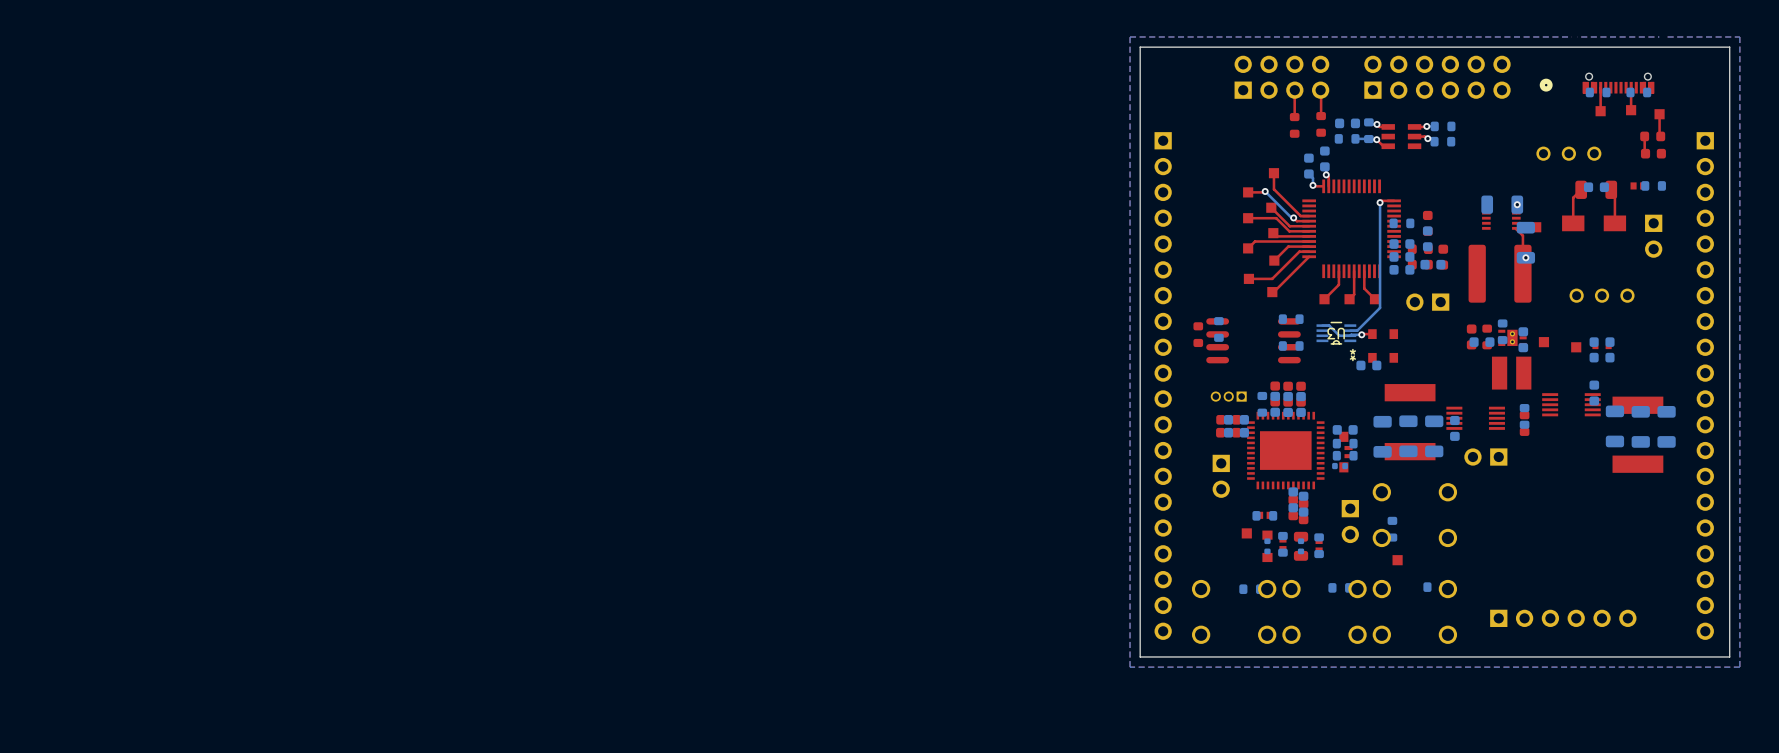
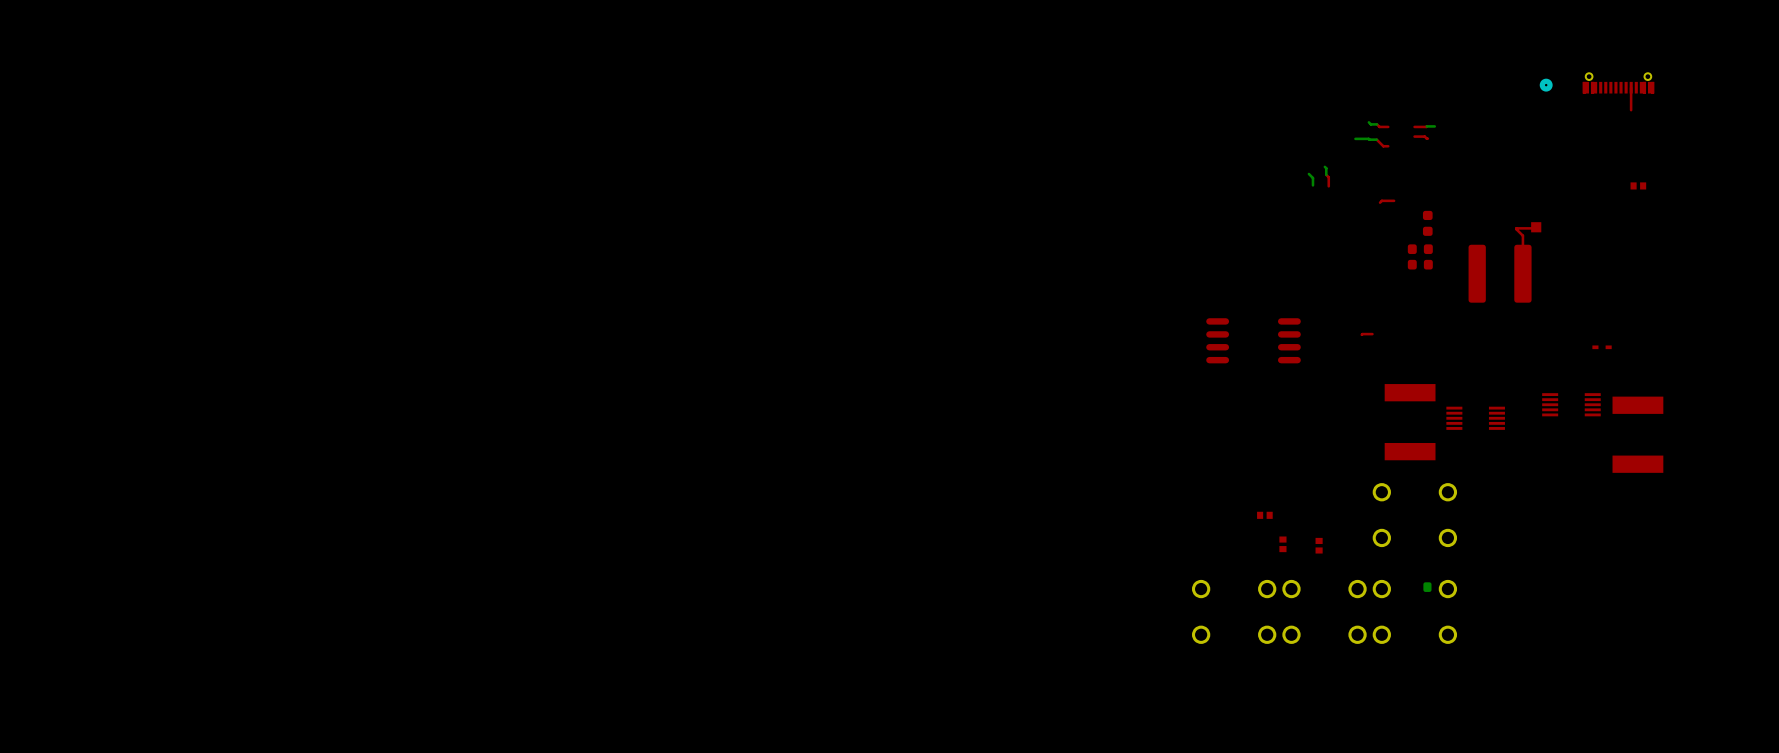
bottom zone outline: (1739, 36) (1739, 667) (1130, 667) (1130, 36) (1739, 36) -> none
top zone outline: (1739, 36) (1739, 667) (1130, 667) (1130, 36) (1739, 36) -> none
board edge: (1729, 47) (1729, 656) (1140, 656) (1140, 47) (1729, 47) -> none
part: (1281, 77) -> none
part: (1437, 77) -> none
top track: (1600, 87) (1600, 111) -> none
top track: (1294, 90) (1294, 117) -> none
top track: (1320, 90) (1321, 116) -> none
part: (1598, 92) -> none
part: (1638, 92) -> none
part: (1631, 110) -> none
part: (1600, 111) -> none
top track: (1659, 114) (1660, 136) -> none
part: (1659, 114) -> none
part: (1347, 123) -> none
part: (1321, 124) -> none
via: (1377, 124) -> none
part: (1294, 125) -> none
via: (1426, 126) -> none
part: (1443, 126) -> none
part: (1368, 130) -> none
part: (1401, 136) -> none
top track: (1644, 136) (1645, 153) -> none
part: (1652, 136) -> none
part: (1347, 138) -> none
via: (1427, 138) -> none
via: (1376, 139) -> none
part: (1442, 141) -> none
part: (1568, 153) -> none
part: (1653, 153) -> none
part: (1324, 158) -> none
part: (1308, 166) -> none
top track: (1273, 173) (1273, 189) (1300, 216) (1309, 216) -> none
part: (1273, 173) -> none
via: (1326, 174) -> none
top track: (1312, 185) (1323, 186) -> none
via: (1312, 185) -> none
part: (1653, 185) -> none
part: (1596, 187) -> none
top track: (1581, 189) (1573, 197) (1573, 223) -> none
part: (1596, 189) -> none
top track: (1611, 189) (1614, 193) (1614, 223) -> none
top track: (1265, 191) (1248, 192) -> none
bottom track: (1265, 191) (1293, 217) -> none
via: (1265, 191) -> none
part: (1248, 192) -> none
bottom track: (1380, 202) (1380, 307) (1357, 330) (1350, 330) -> none
via: (1380, 202) -> none
part: (1502, 204) -> none
via: (1517, 204) -> none
top track: (1271, 207) (1289, 226) (1309, 226) -> none
part: (1271, 207) -> none
top track: (1293, 217) (1296, 221) (1309, 221) -> none
via: (1293, 217) -> none
top track: (1248, 218) (1276, 218) (1289, 231) (1309, 231) -> none
part: (1248, 218) -> none
part: (1501, 218) -> none
part: (1401, 223) -> none
part: (1594, 223) -> none
part: (1351, 228) -> none
top track: (1273, 233) (1276, 236) (1309, 236) -> none
part: (1273, 233) -> none
part: (1653, 236) -> none
part: (1427, 238) -> none
top track: (1309, 241) (1255, 241) (1248, 248) -> none
part: (1525, 242) -> none
part: (1401, 244) -> none
top track: (1309, 246) (1288, 246) (1274, 260) -> none
part: (1248, 248) -> none
top track: (1309, 251) (1299, 251) (1272, 278) (1248, 278) -> none
top track: (1309, 256) (1272, 292) -> none
part: (1401, 256) -> none
part: (1443, 257) -> none
via: (1525, 257) -> none
part: (1274, 260) -> none
part: (1432, 264) -> none
part: (1401, 269) -> none
top track: (1338, 271) (1338, 284) (1324, 299) -> none
top track: (1354, 271) (1354, 294) (1349, 299) -> none
top track: (1364, 271) (1364, 288) (1374, 299) -> none
part: (1248, 278) -> none
part: (1272, 292) -> none
part: (1602, 295) -> none
part: (1324, 299) -> none
part: (1349, 299) -> none
part: (1374, 299) -> none
part: (1427, 302) -> none
part: (1291, 319) -> none
bottom track: (1322, 325) (1329, 325) (1339, 335) (1361, 334) -> none
part: (1218, 329) -> none
part: (1502, 331) -> none
U3: (1336, 333) -> none
part: (1198, 334) -> none
via: (1361, 334) -> none
part: (1471, 336) -> none
part: (1487, 336) -> none
part: (1512, 337) -> none
part: (1523, 339) -> none
part: (1481, 342) -> none
part: (1543, 342) -> none
part: (1602, 342) -> none
part: (1383, 345) -> none
part: (1291, 346) -> none
part: (1576, 347) -> none
part: (1602, 357) -> none
part: (1368, 365) -> none
part: (1511, 373) -> none
part: (1163, 386) -> none
part: (1705, 386) -> none
part: (1275, 393) -> none
part: (1594, 393) -> none
part: (1288, 394) -> none
part: (1301, 394) -> none
part: (1228, 396) -> none
part: (1262, 404) -> none
part: (1275, 404) -> none
part: (1288, 404) -> none
part: (1301, 404) -> none
part: (1524, 416) -> none
part: (1228, 419) -> none
part: (1236, 419) -> none
part: (1524, 423) -> none
part: (1614, 426) -> none
part: (1640, 426) -> none
part: (1666, 426) -> none
part: (1454, 428) -> none
part: (1345, 429) -> none
part: (1228, 432) -> none
part: (1236, 432) -> none
part: (1382, 436) -> none
part: (1408, 436) -> none
part: (1434, 436) -> none
part: (1345, 443) -> none
part: (1285, 450) -> none
part: (1345, 452) -> none
part: (1345, 455) -> none
part: (1485, 457) -> none
part: (1340, 466) -> none
part: (1221, 476) -> none
part: (1293, 499) -> none
part: (1303, 504) -> none
part: (1293, 507) -> none
part: (1303, 511) -> none
part: (1264, 515) -> none
part: (1350, 521) -> none
part: (1392, 529) -> none
part: (1246, 533) -> none
part: (1282, 544) -> none
part: (1319, 545) -> none
part: (1267, 546) -> none
part: (1267, 546) -> none
part: (1301, 546) -> none
part: (1301, 546) -> none
part: (1397, 560) -> none
part: (1340, 587) -> none
part: (1251, 589) -> none
part: (1563, 618) -> none

